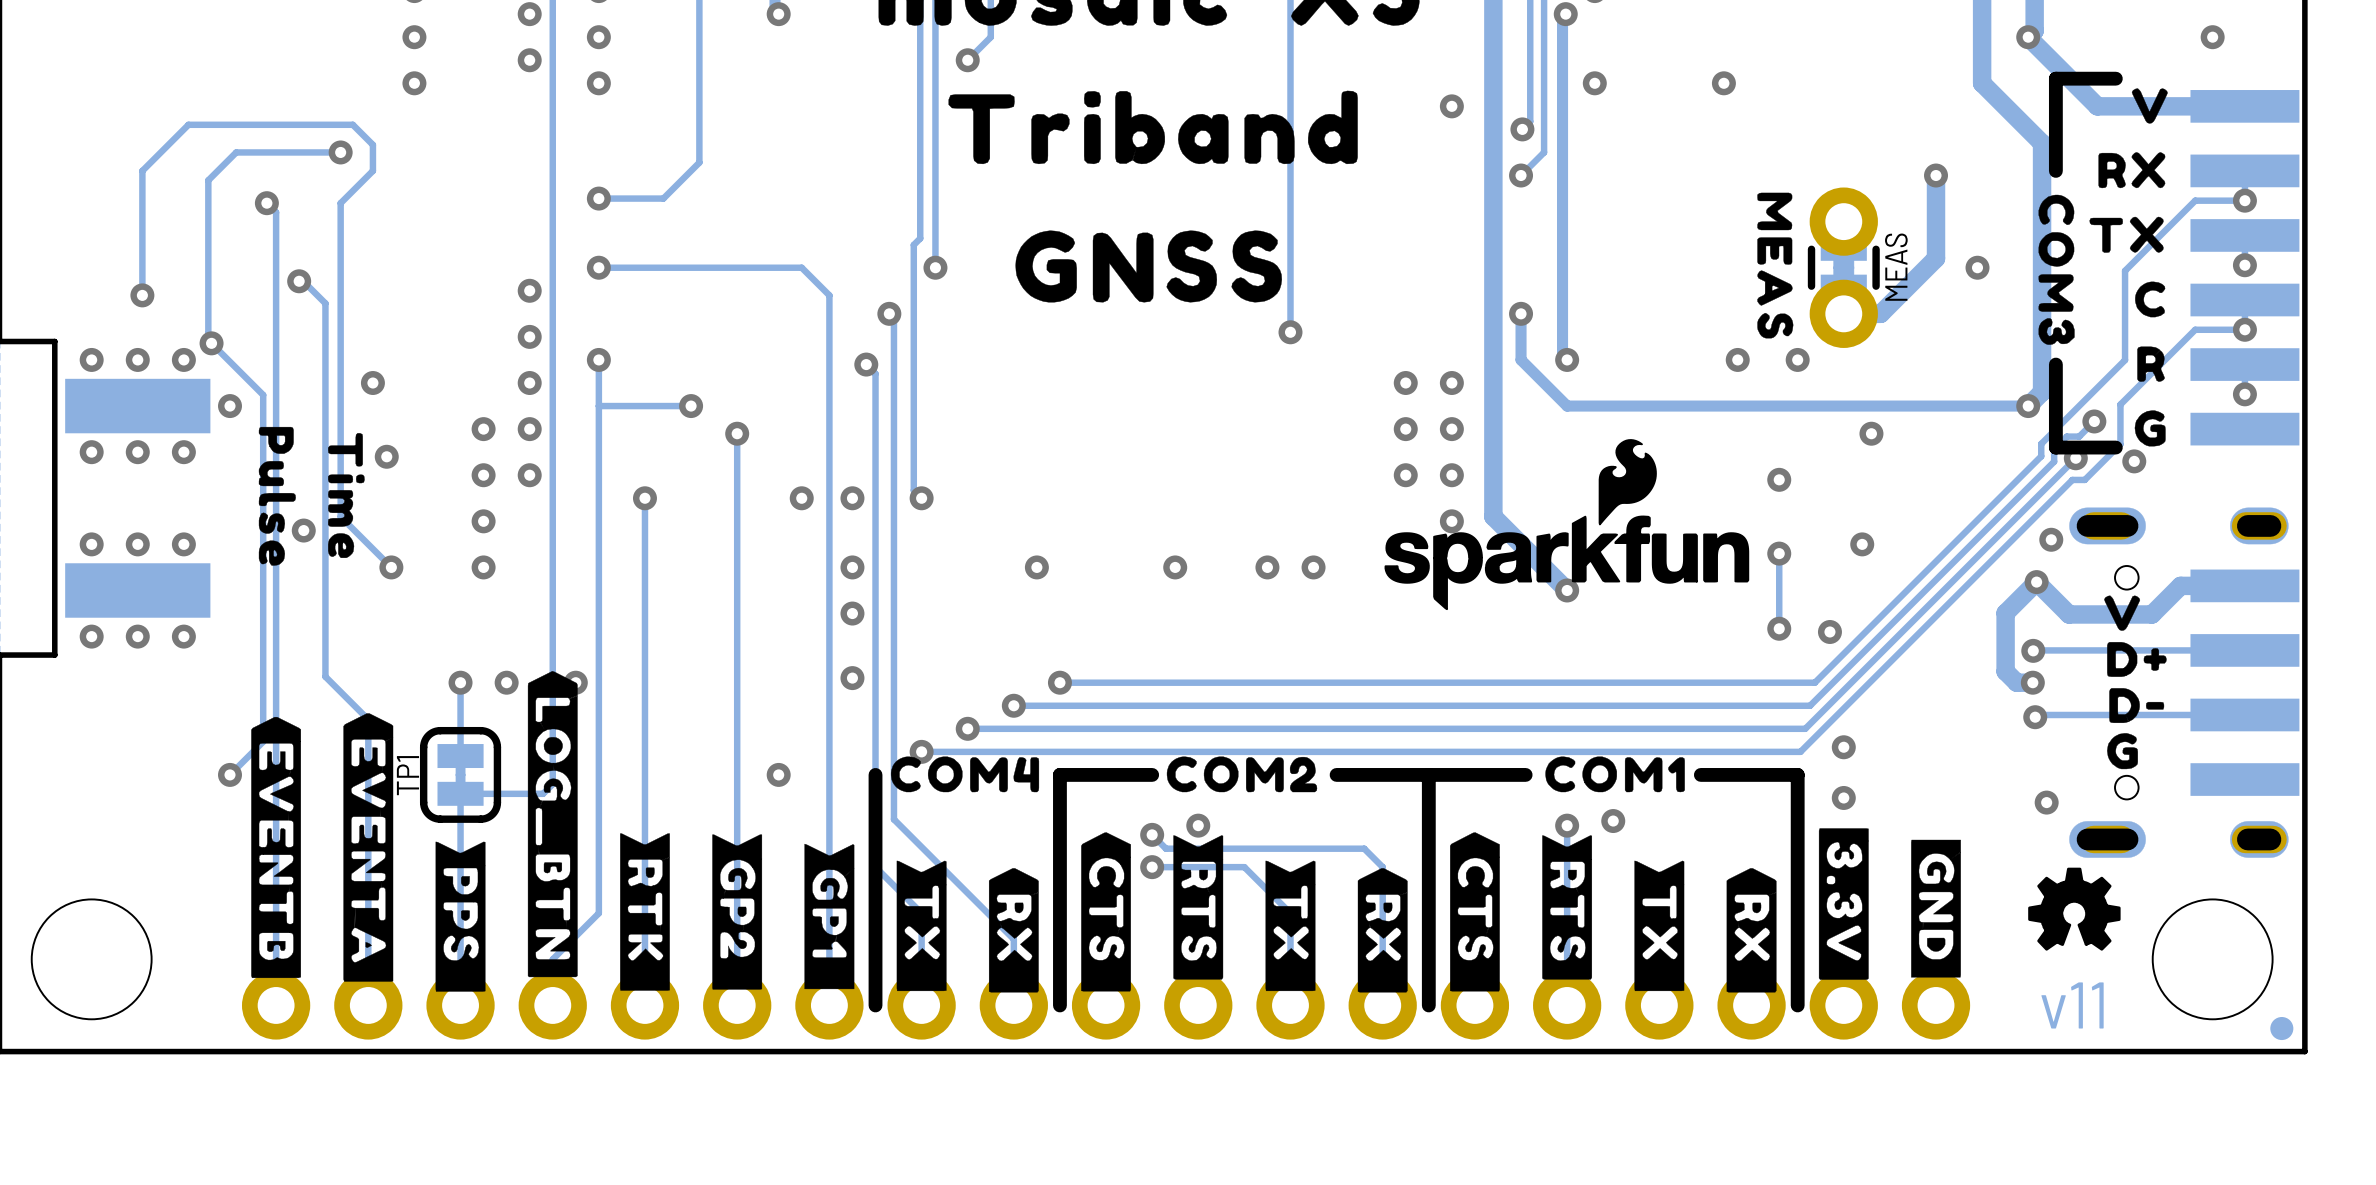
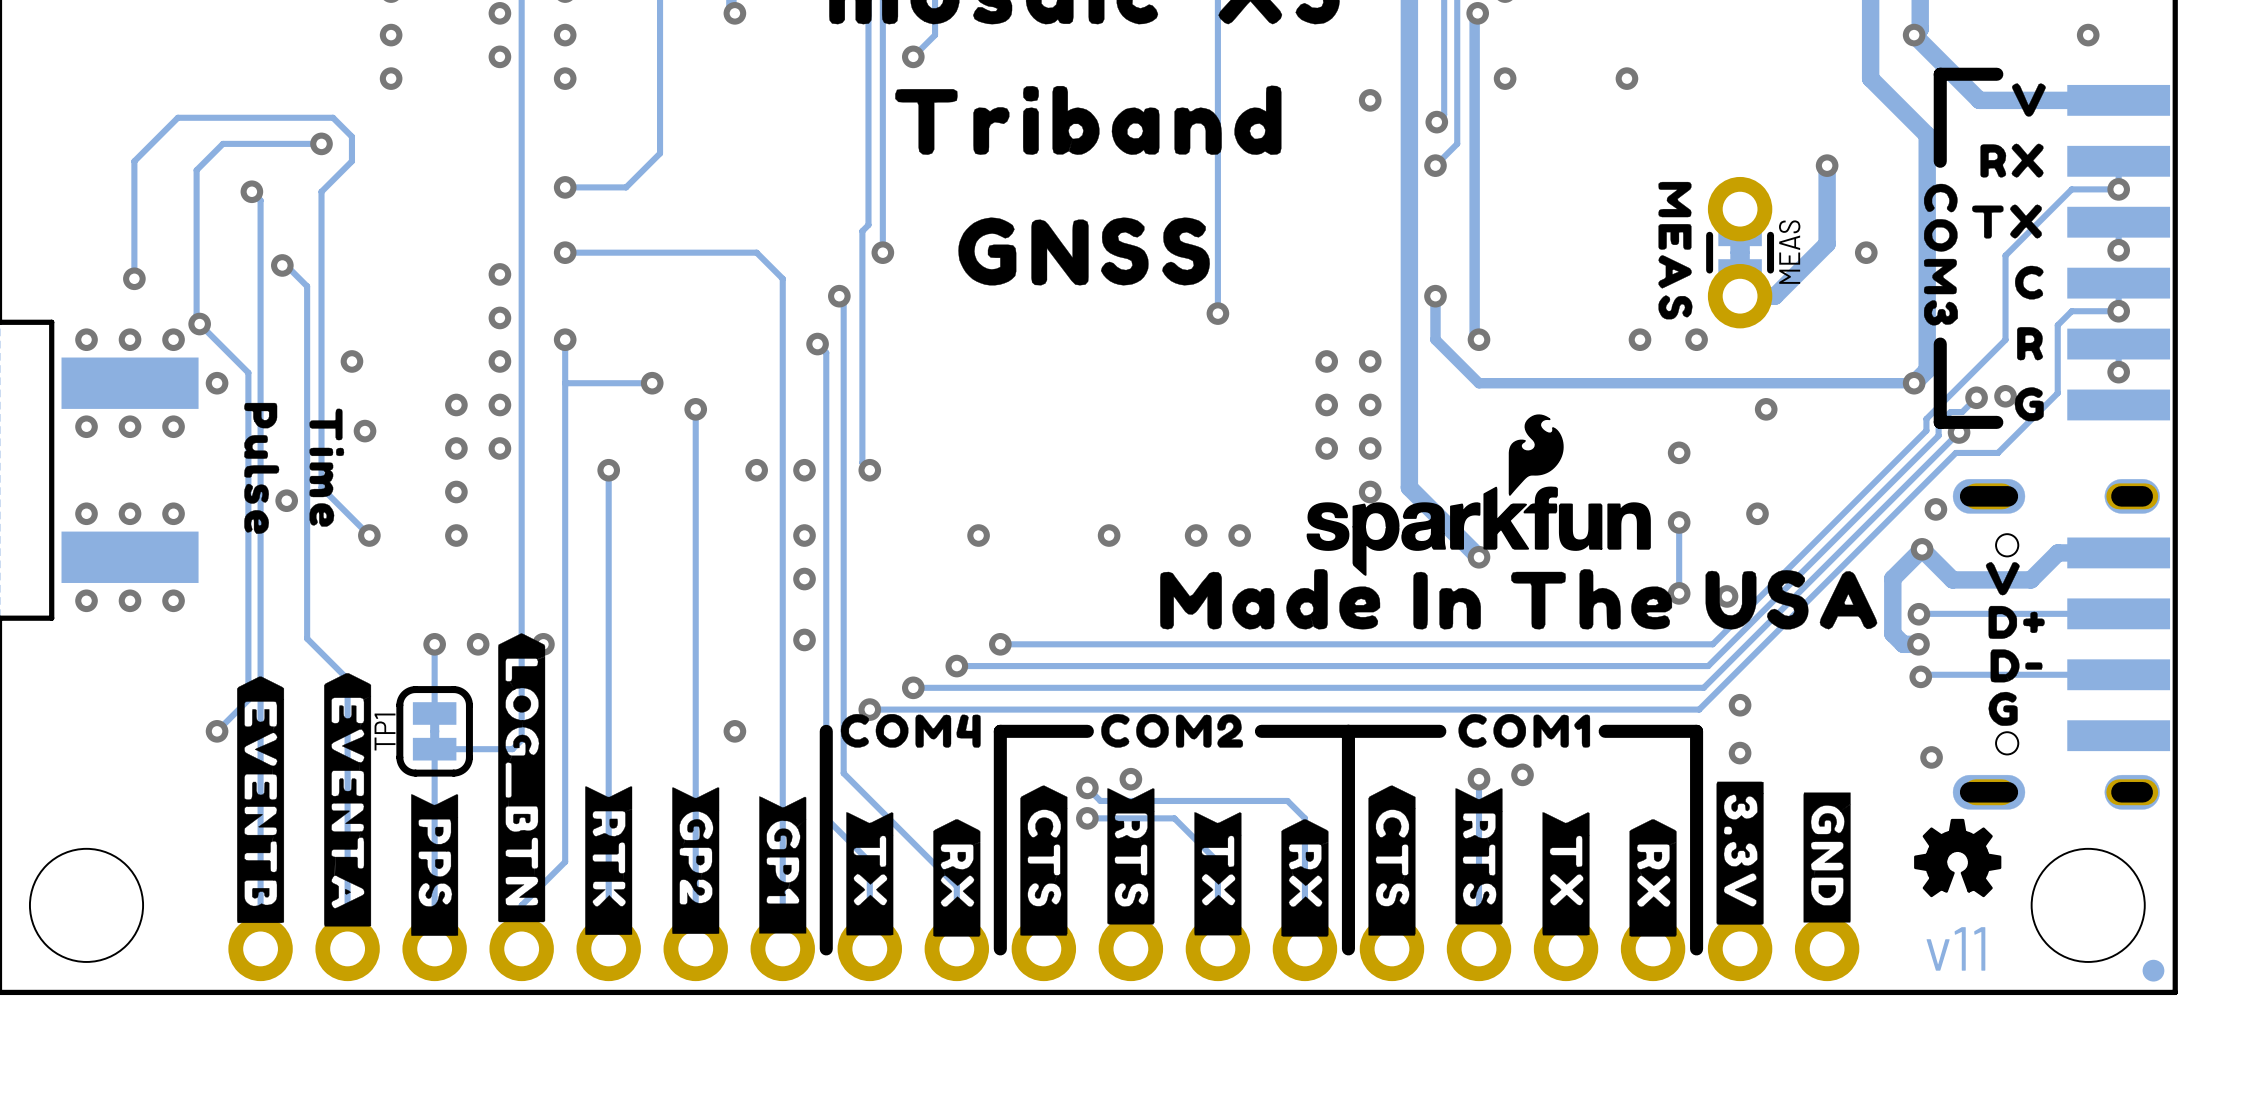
track: (2180, 344) (2120, 404) (2120, 444) (2084, 479) -> (2057, 325) (2057, 393) (1998, 452) (1967, 452)
via position: (2134, 461) -> (2005, 396)
drawing: none -> [1160, 569, 1878, 630]

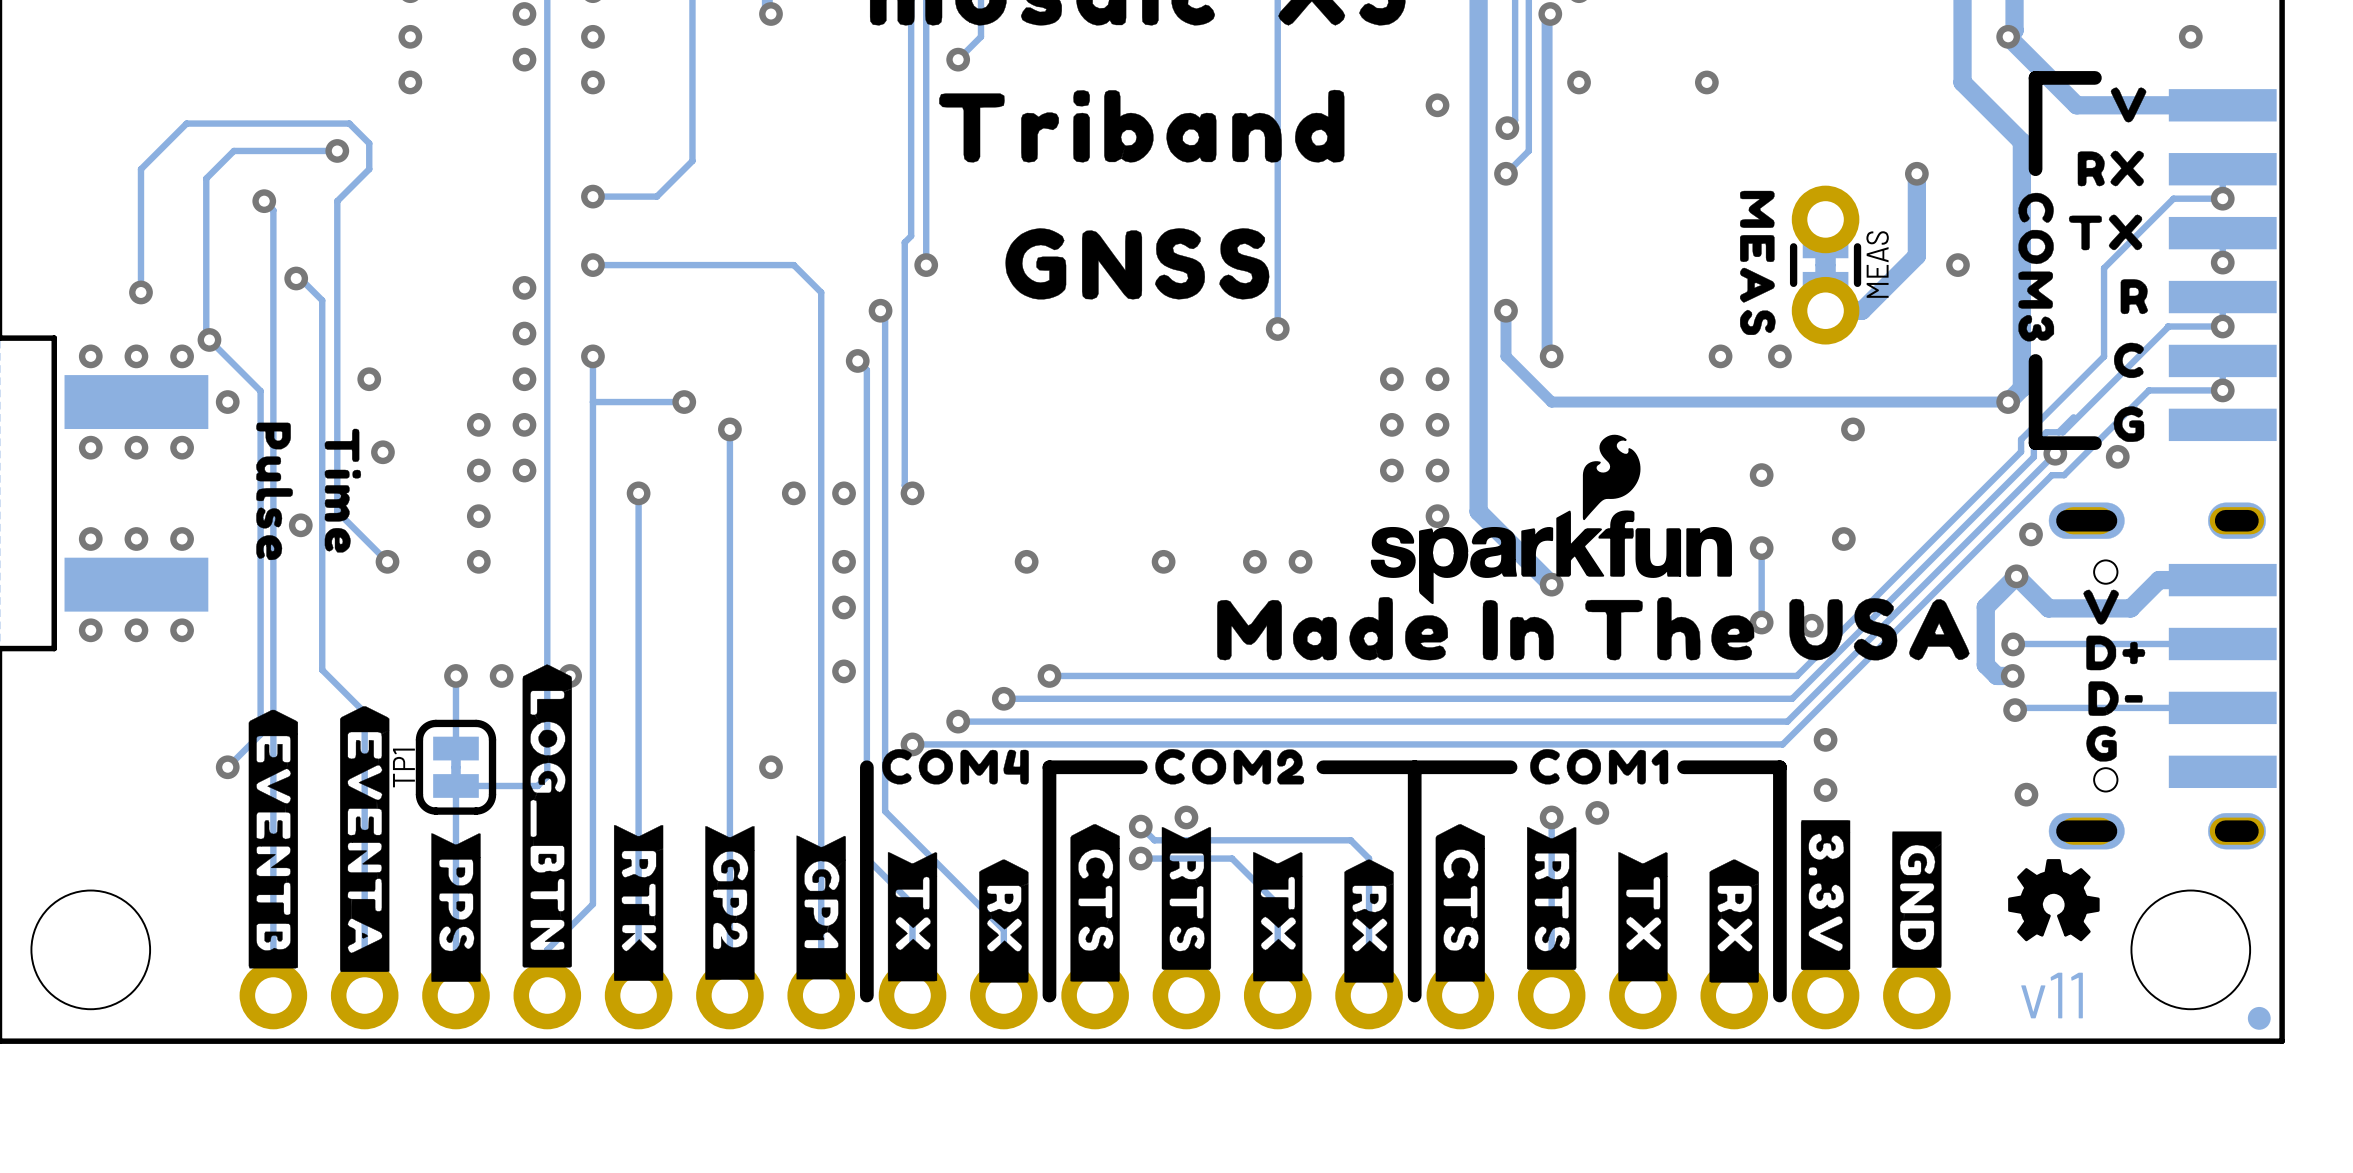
drawing position: (2029, 282) -> (2128, 360)
track: (2071, 311) (2057, 325) (2057, 393) (1998, 452) (1967, 452) -> (2173, 326) (2167, 326) (2062, 432) (2058, 432)
drawing position: (2030, 343) -> (2134, 296)
track: none -> (2222, 390) (2148, 390) (2064, 475)
via: (2005, 396) -> none
via: (1976, 397) -> none
via: none -> (2117, 456)

